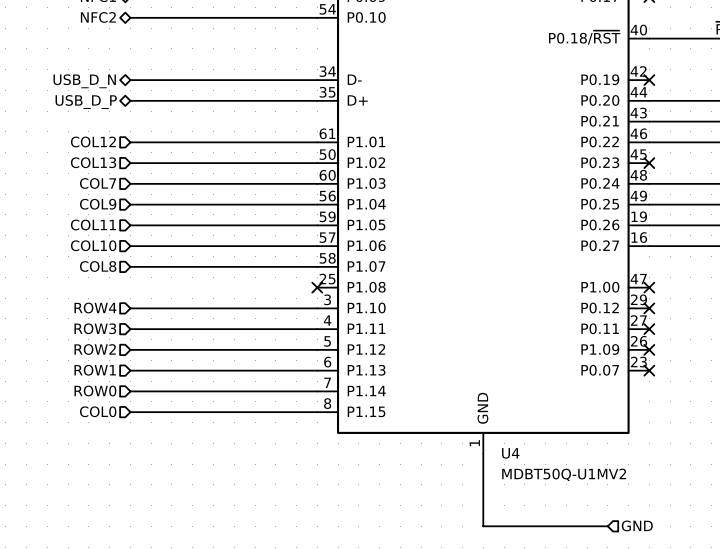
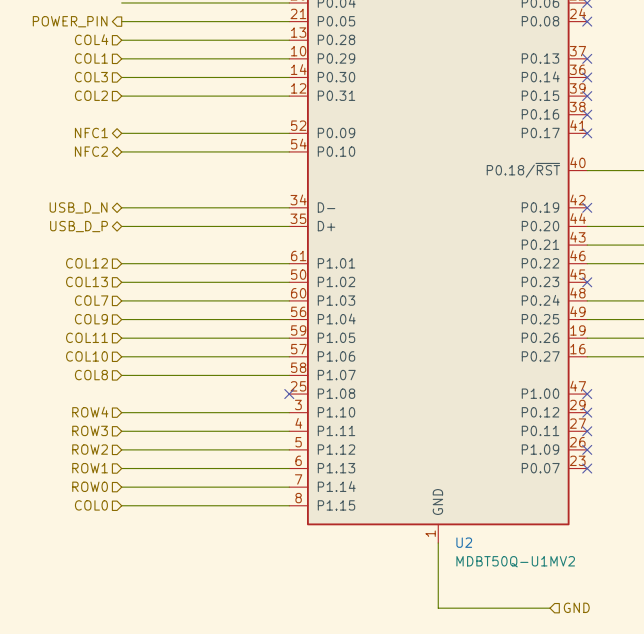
U4 name: U4 (510, 453) -> U2 (464, 542)

